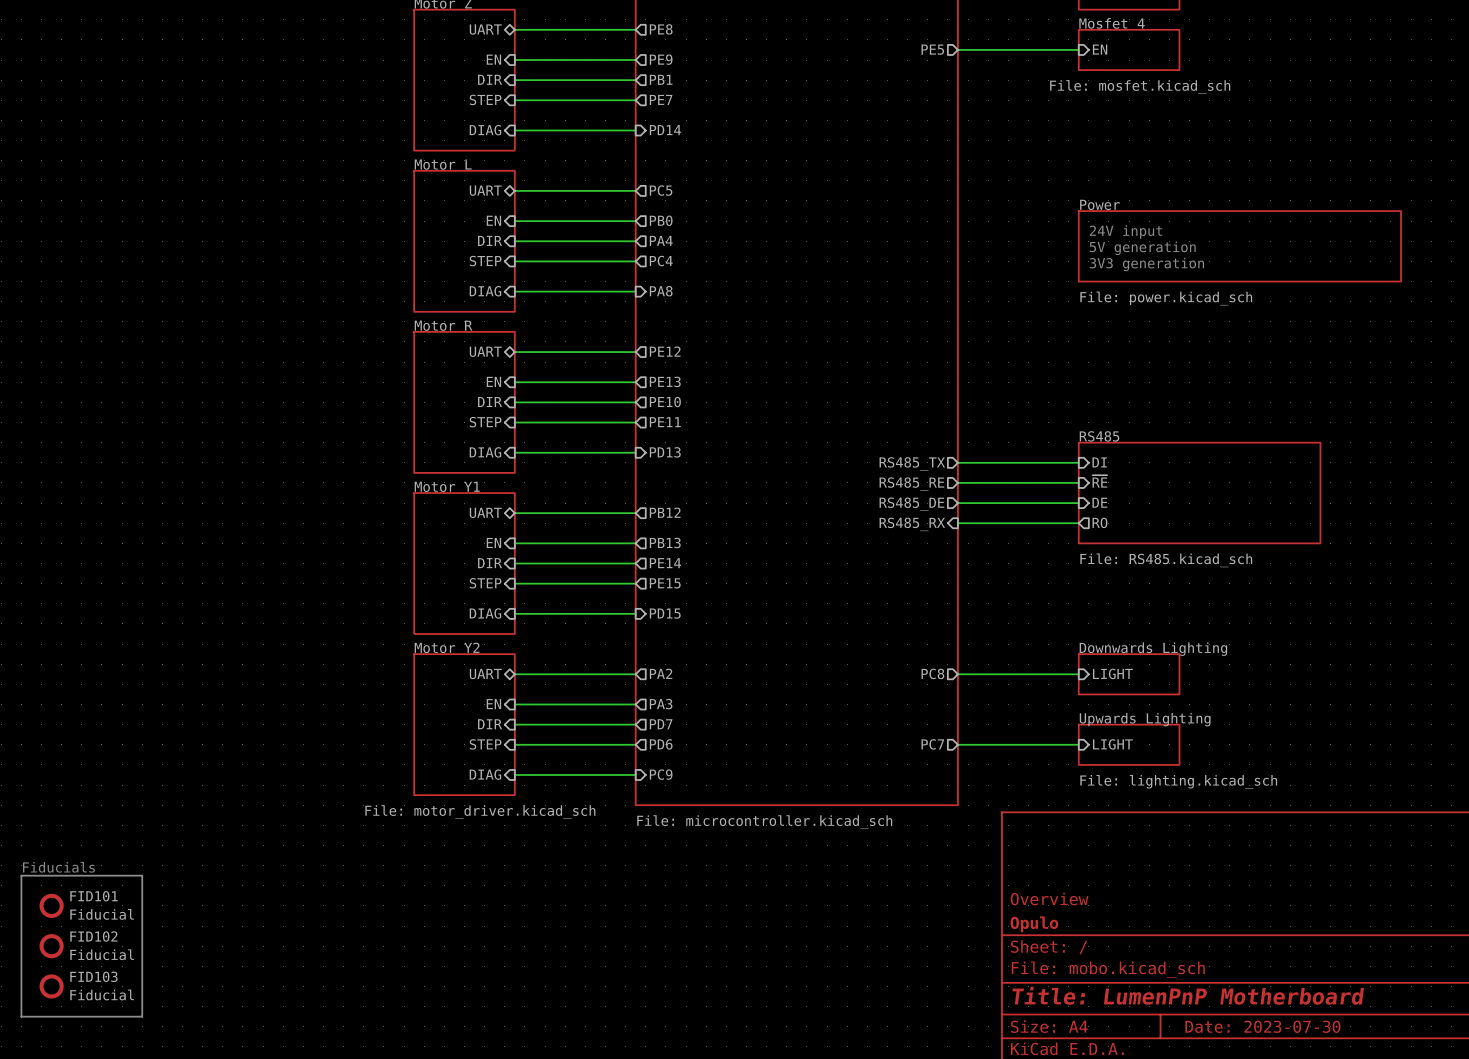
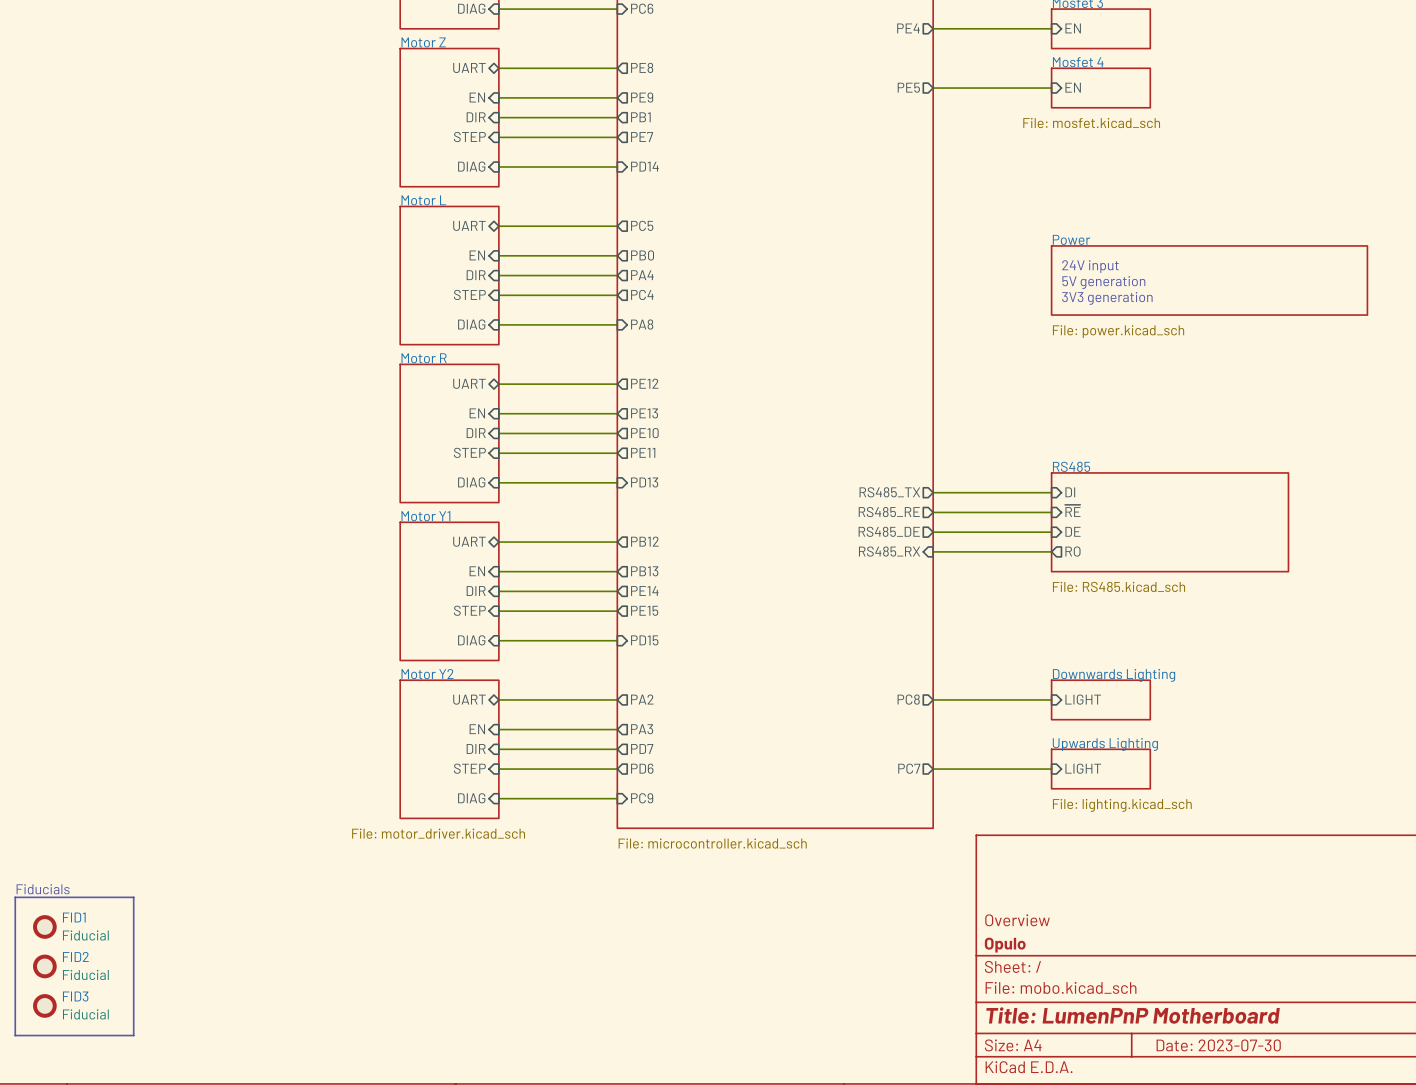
FID101 name: FID101 (94, 896) -> FID1 (74, 917)
FID102 name: FID102 (93, 936) -> FID2 (75, 956)
FID103 name: FID103 (93, 976) -> FID3 (75, 996)

